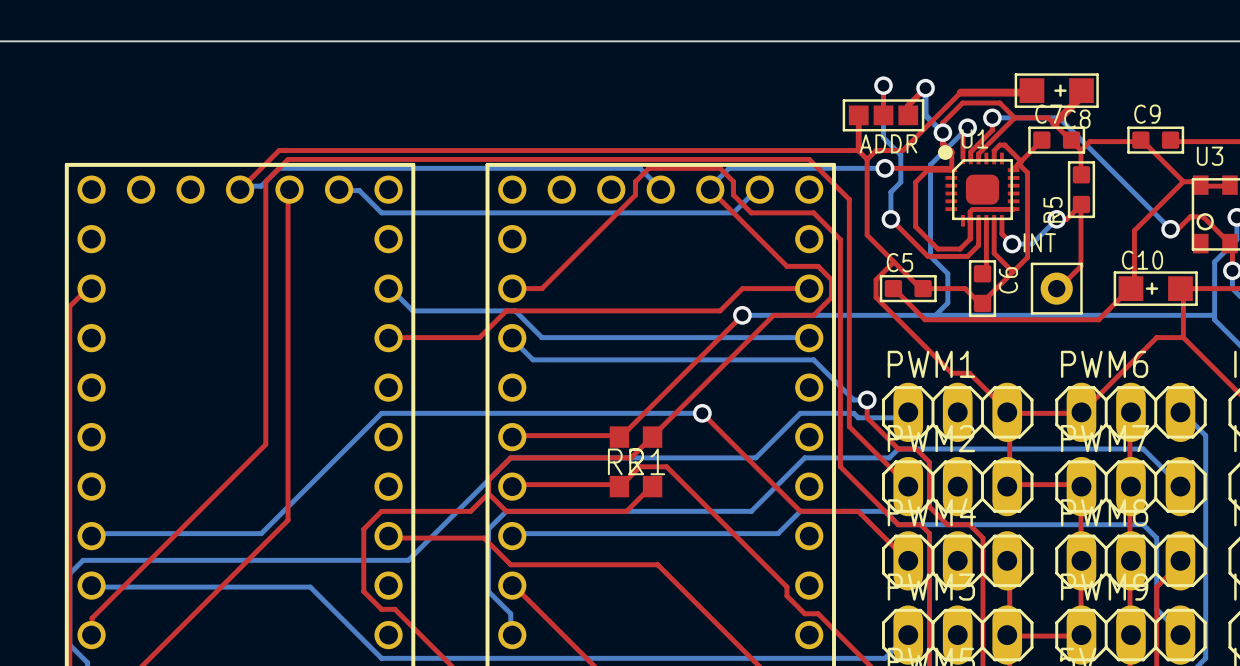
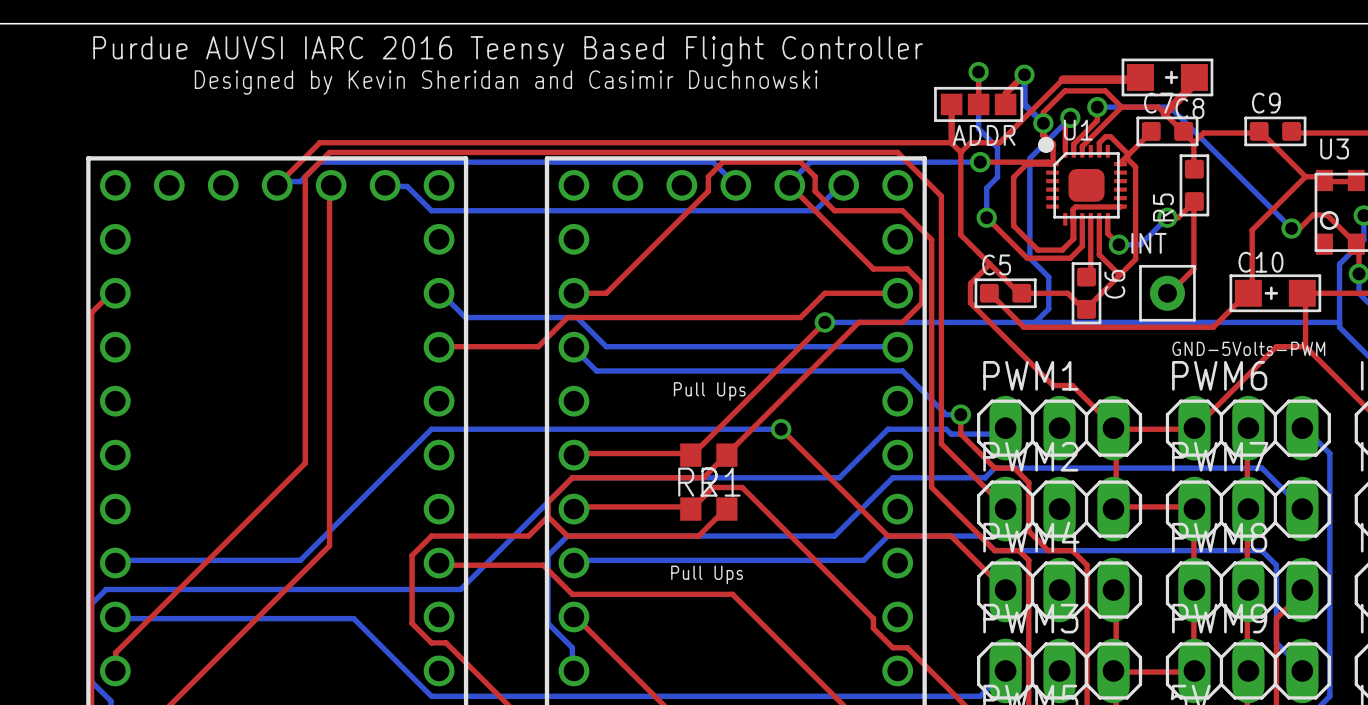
text: none -> Purdue AUVSI IARC 2016 Teensy Based Flight Controller (508, 51)
text: none -> Designed by Kevin Sheridan and Casimir Duchnowski (506, 82)
text: none -> GND-5Volts-PWM (1248, 348)
text: none -> Pull Ups (709, 391)
text: none -> Pull Ups (707, 574)

